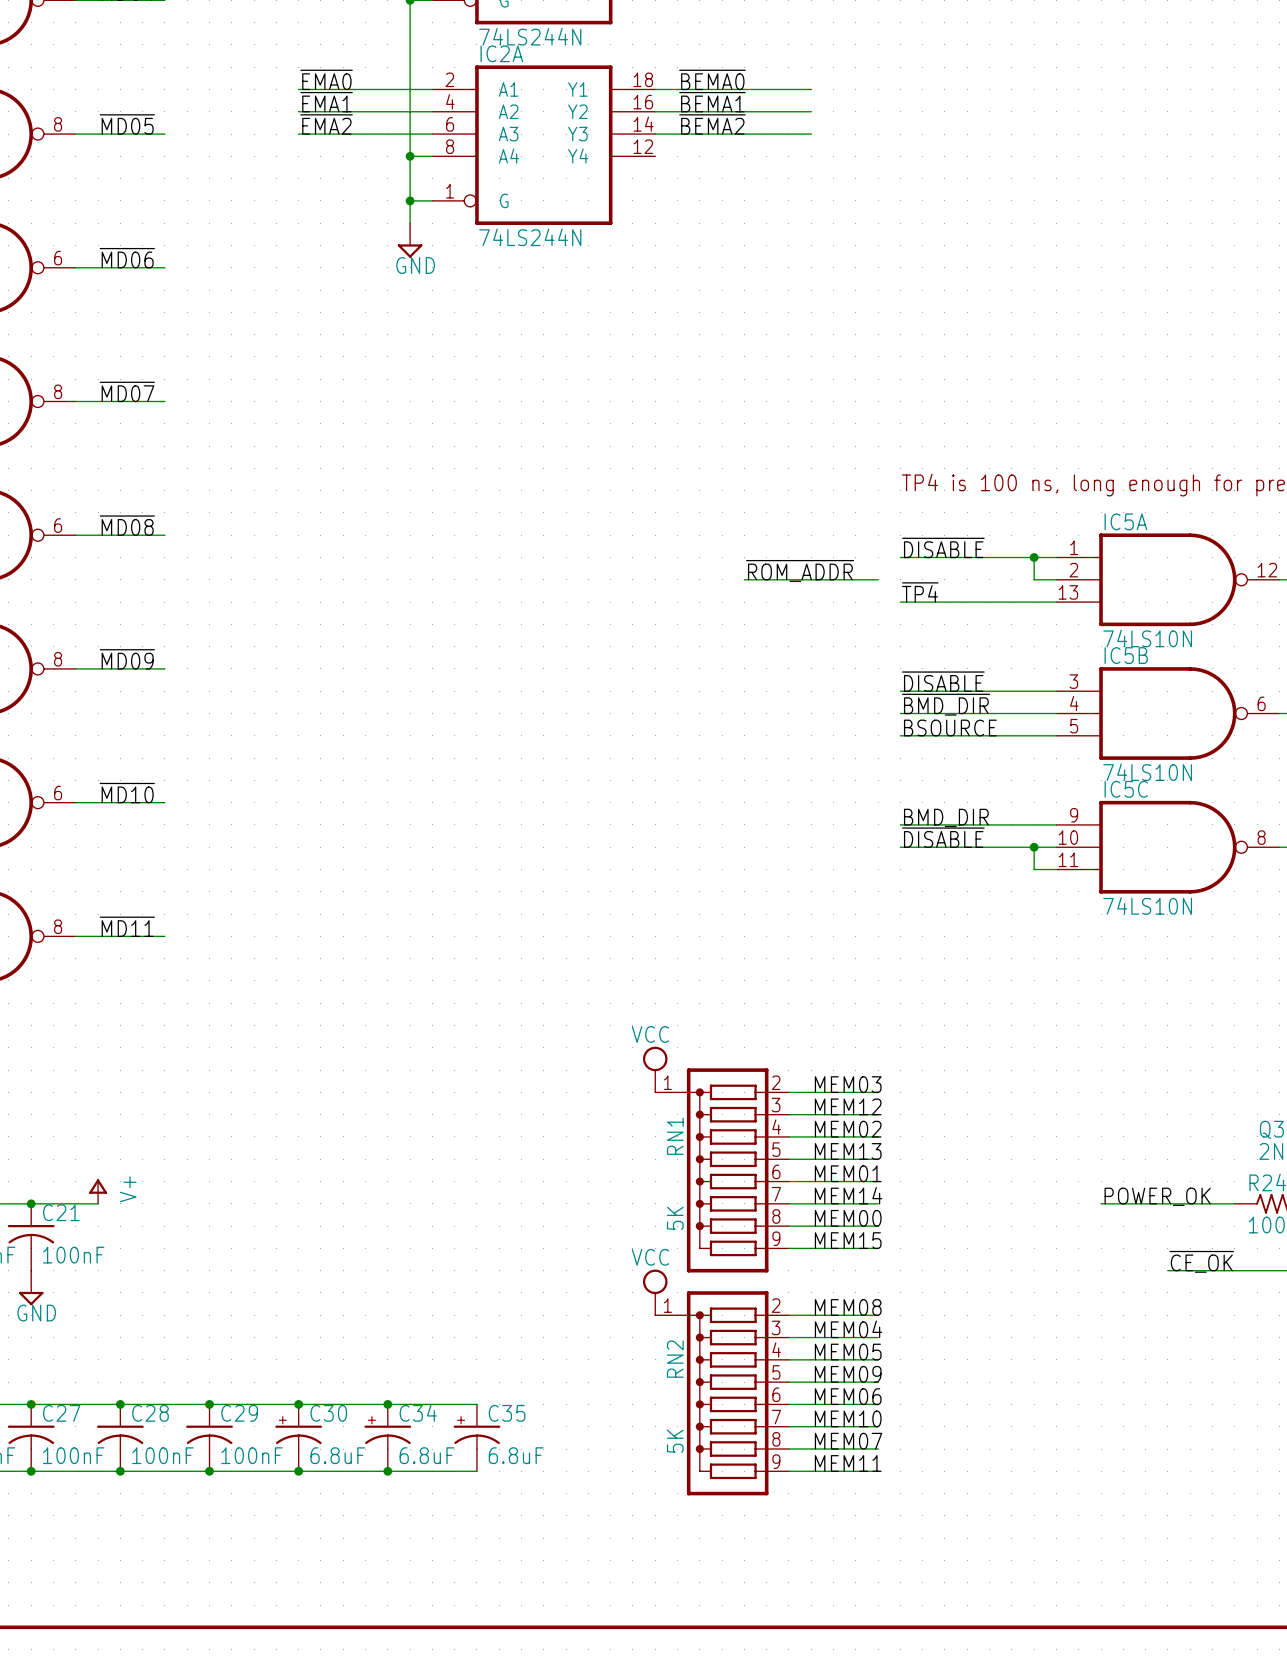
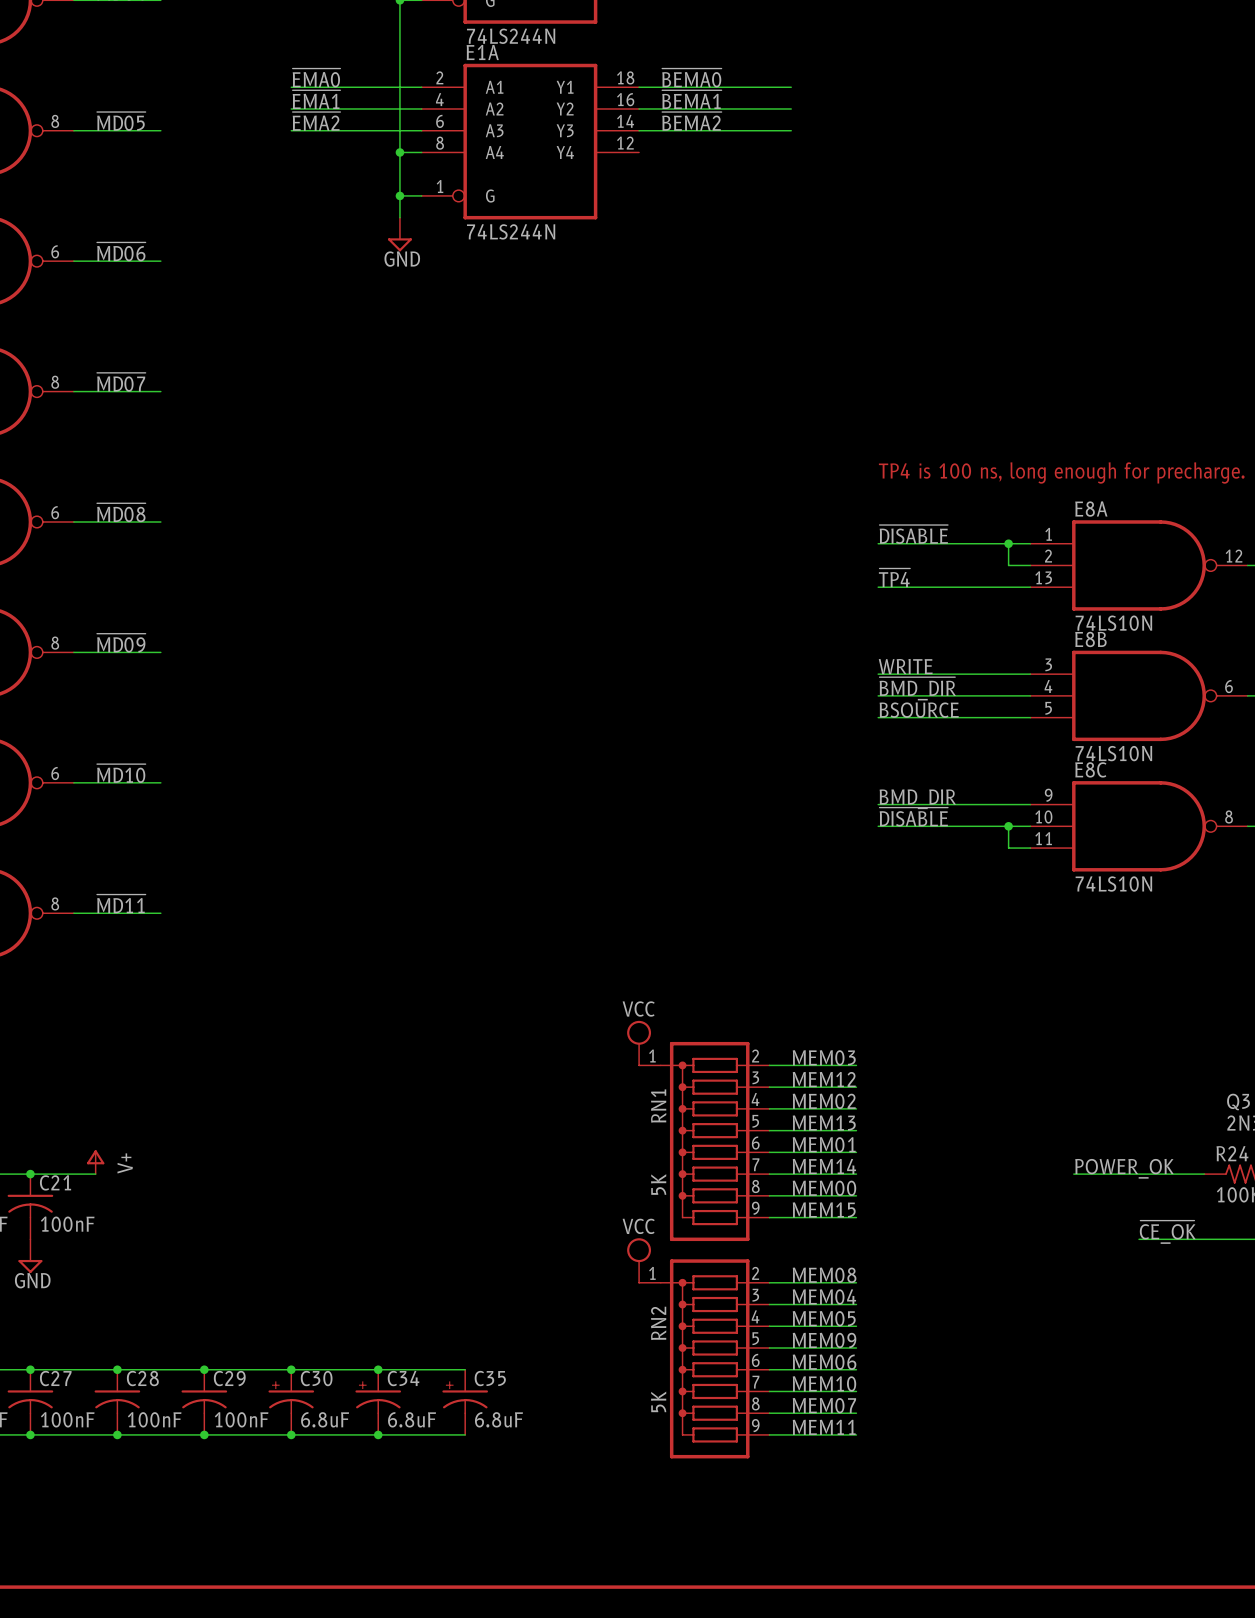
IC2A name: IC2A (501, 53) -> E1A (482, 52)
IC5A name: IC5A (1125, 521) -> E8A (1091, 509)
label: ~{ROM_ADDR} (800, 570) -> none
wire: (744, 579) (878, 579) -> none
IC5B name: IC5B (1126, 655) -> E8B (1090, 639)
label: ~{DISABLE} (943, 681) -> WRITE (905, 666)
IC5C name: IC5C (1126, 789) -> E8C (1090, 769)

